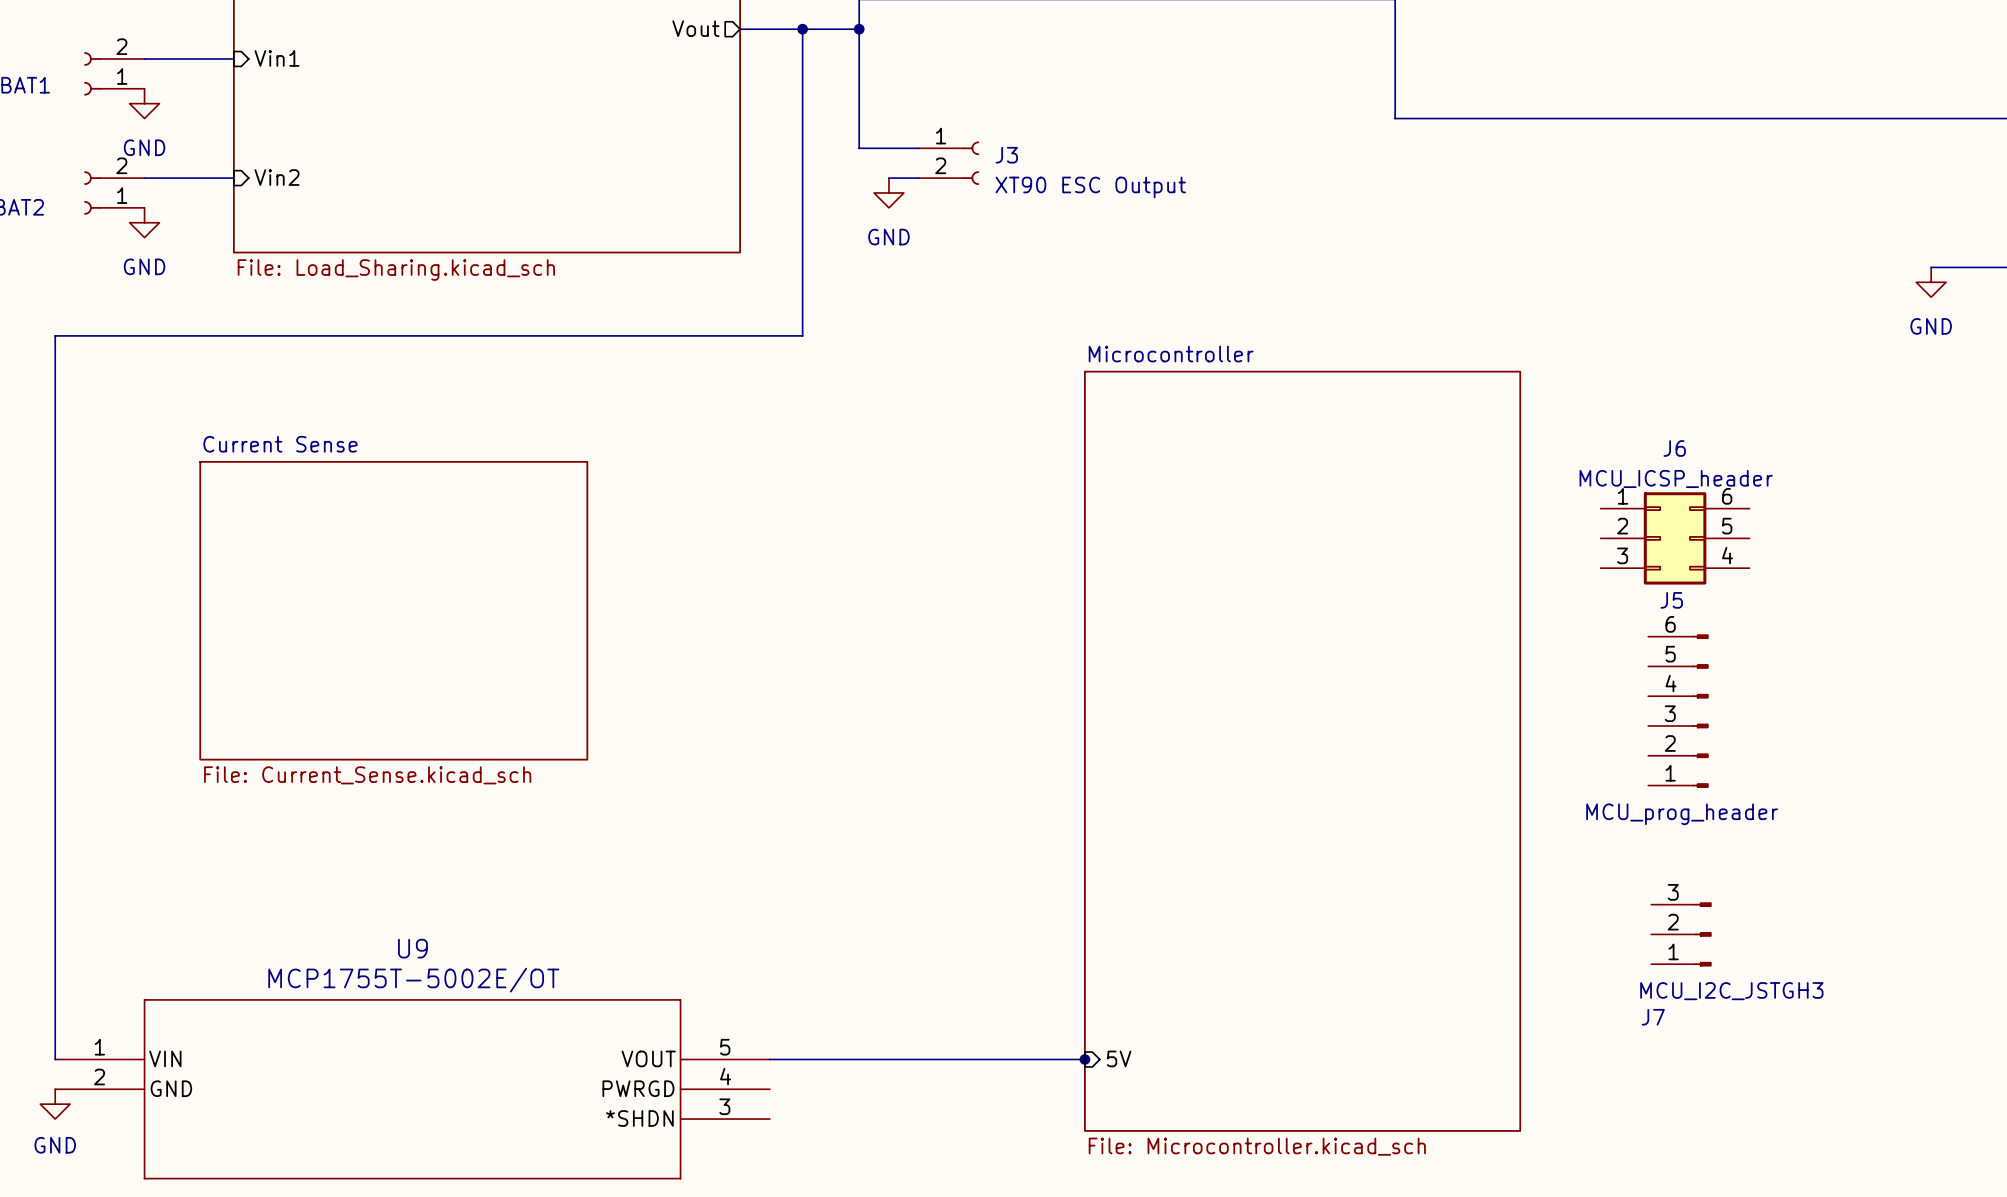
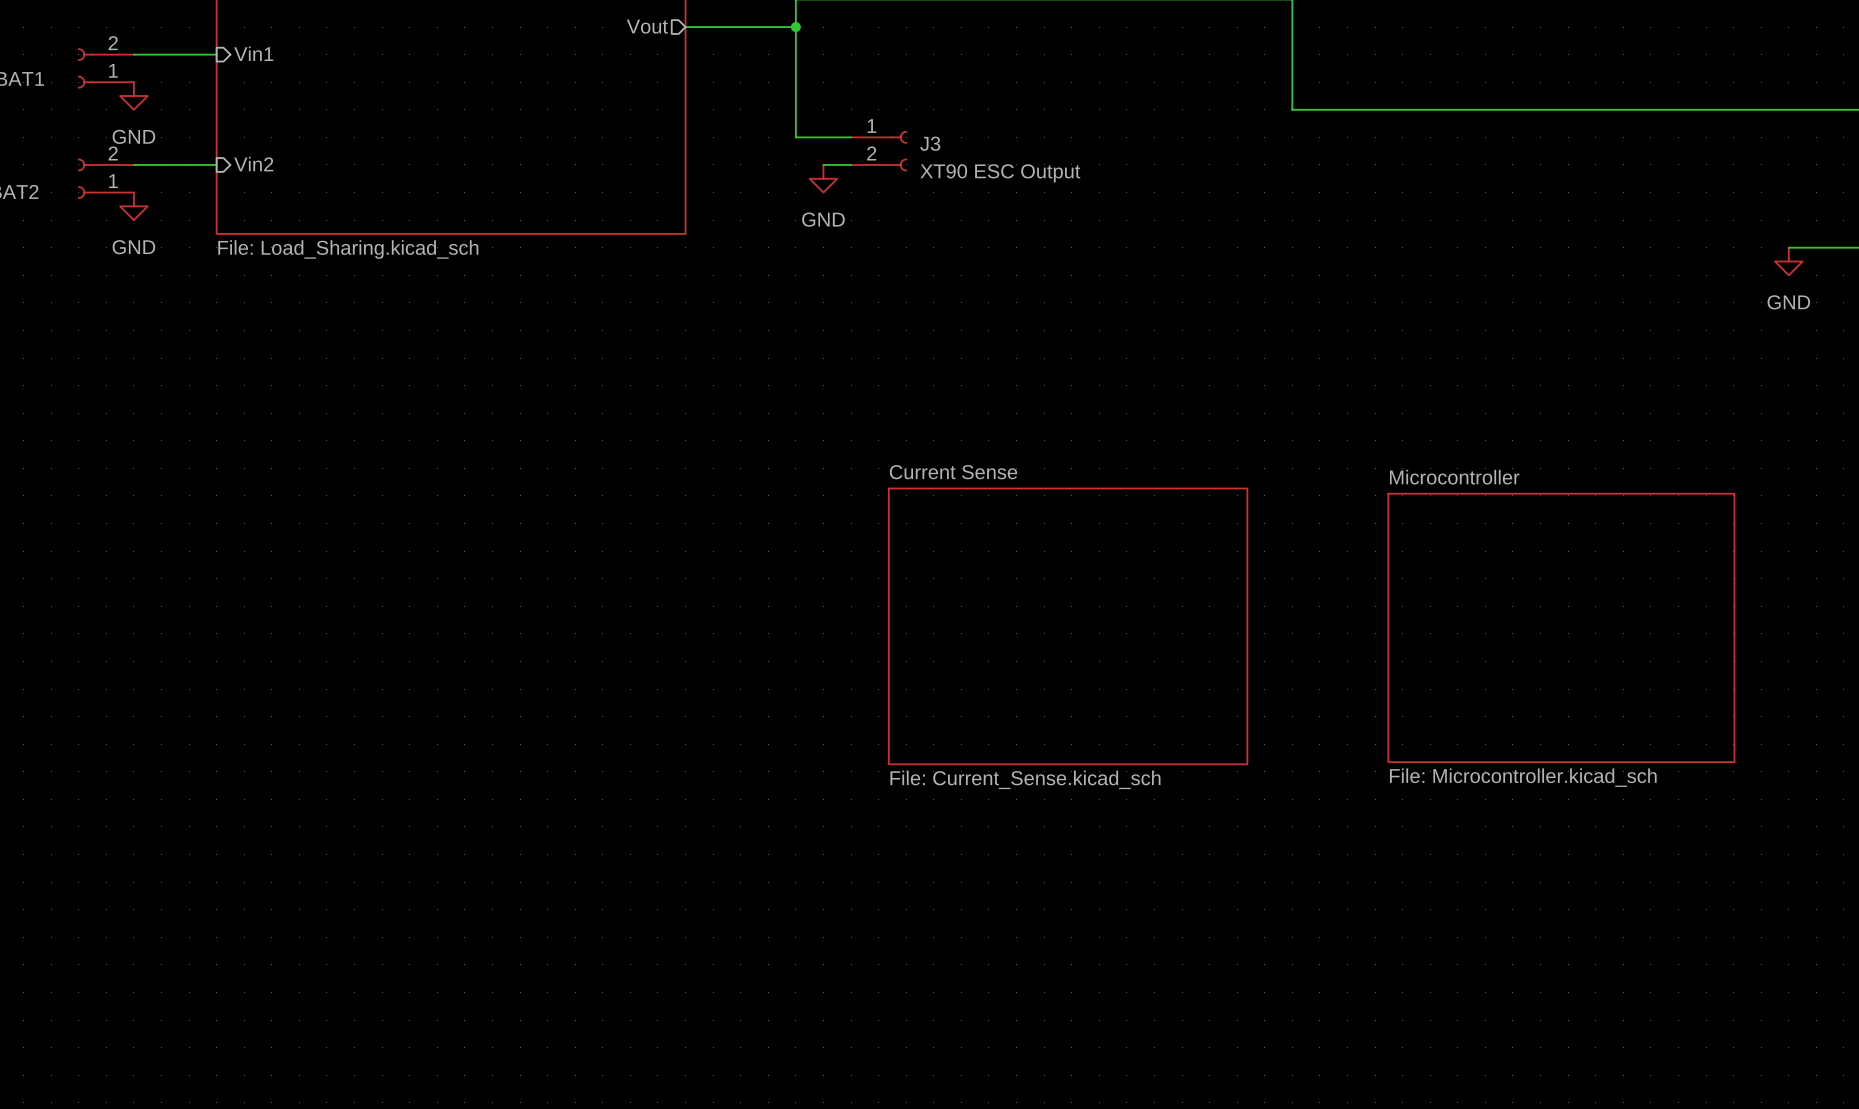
wire: (802, 29) (802, 335) (55, 335) (55, 1059) -> none
junction: (802, 29) -> none
J6: MCU_ICSP_header (1675, 538) -> none
sheet Current Sense: File: Current_Sense.kicad_sch (393, 610) -> none
sheet Current Sense: none -> File: Current_Sense.kicad_sch (1068, 626)
sheet Microcontroller: none -> File: Microcontroller.kicad_sch (1561, 627)
J5: MCU_prog_header (1678, 711) -> none
sheet Microcontroller: File: Microcontroller.kicad_sch (1302, 751) -> none
J7: MCU_I2C_JSTGH3 (1681, 934) -> none
sheet pin: 5V (1119, 1058) -> none
wire: (769, 1059) (1085, 1059) -> none
junction: (1084, 1059) -> none
U9: MCP1755T-5002E/OT (412, 1089) -> none
power symbol: GND (55, 1104) -> none

